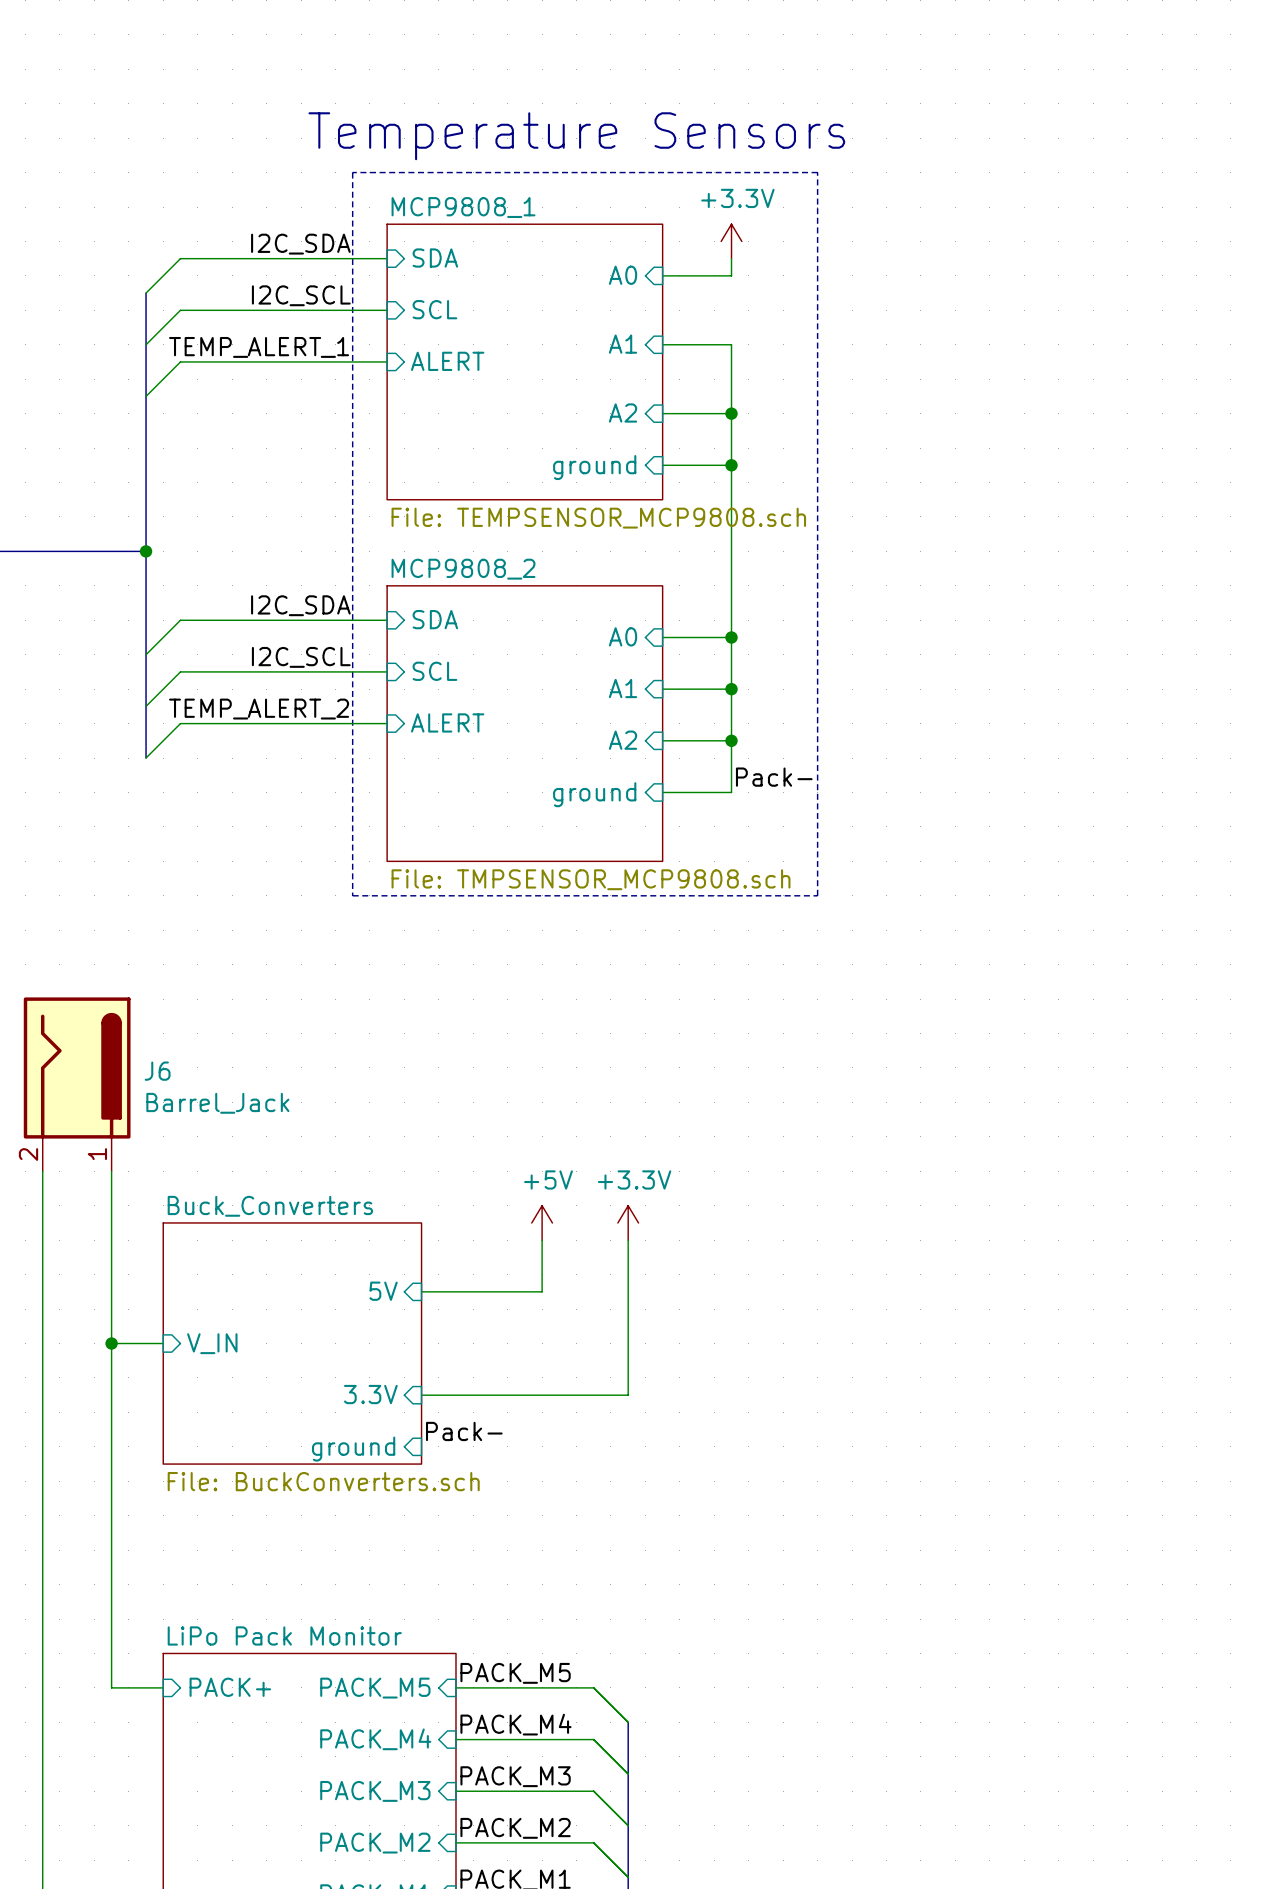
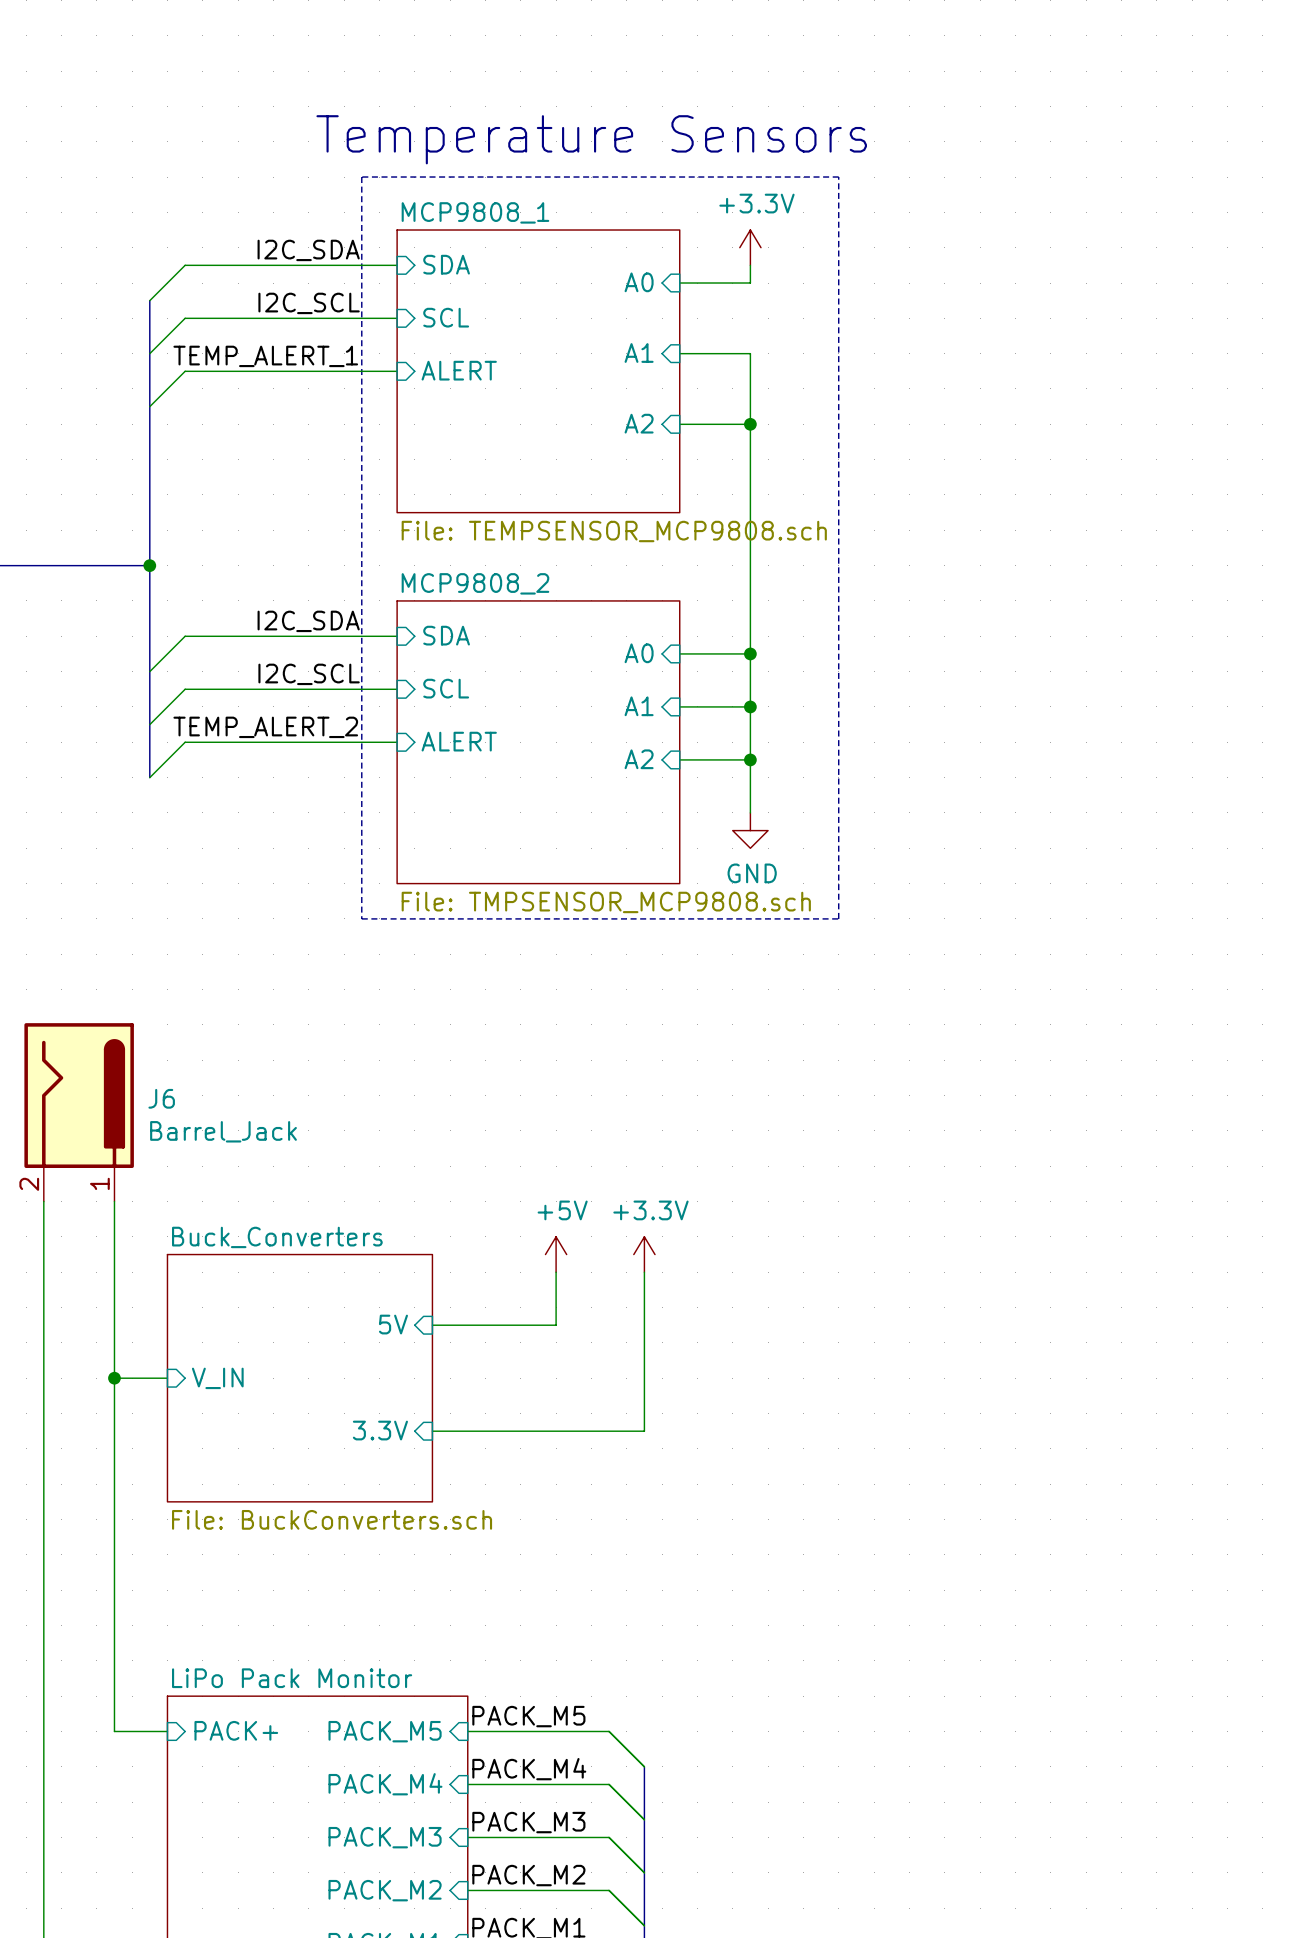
wire: (662, 465) (731, 465) -> none
junction: (731, 465) -> none
sheet pin: ground (594, 467) -> none
label: Pack- (774, 777) -> none
wire: (662, 792) (731, 792) -> none
sheet pin: ground (594, 794) -> none
power symbol: none -> GND (750, 830)
label: Pack- (464, 1431) -> none
sheet pin: ground (353, 1449) -> none

